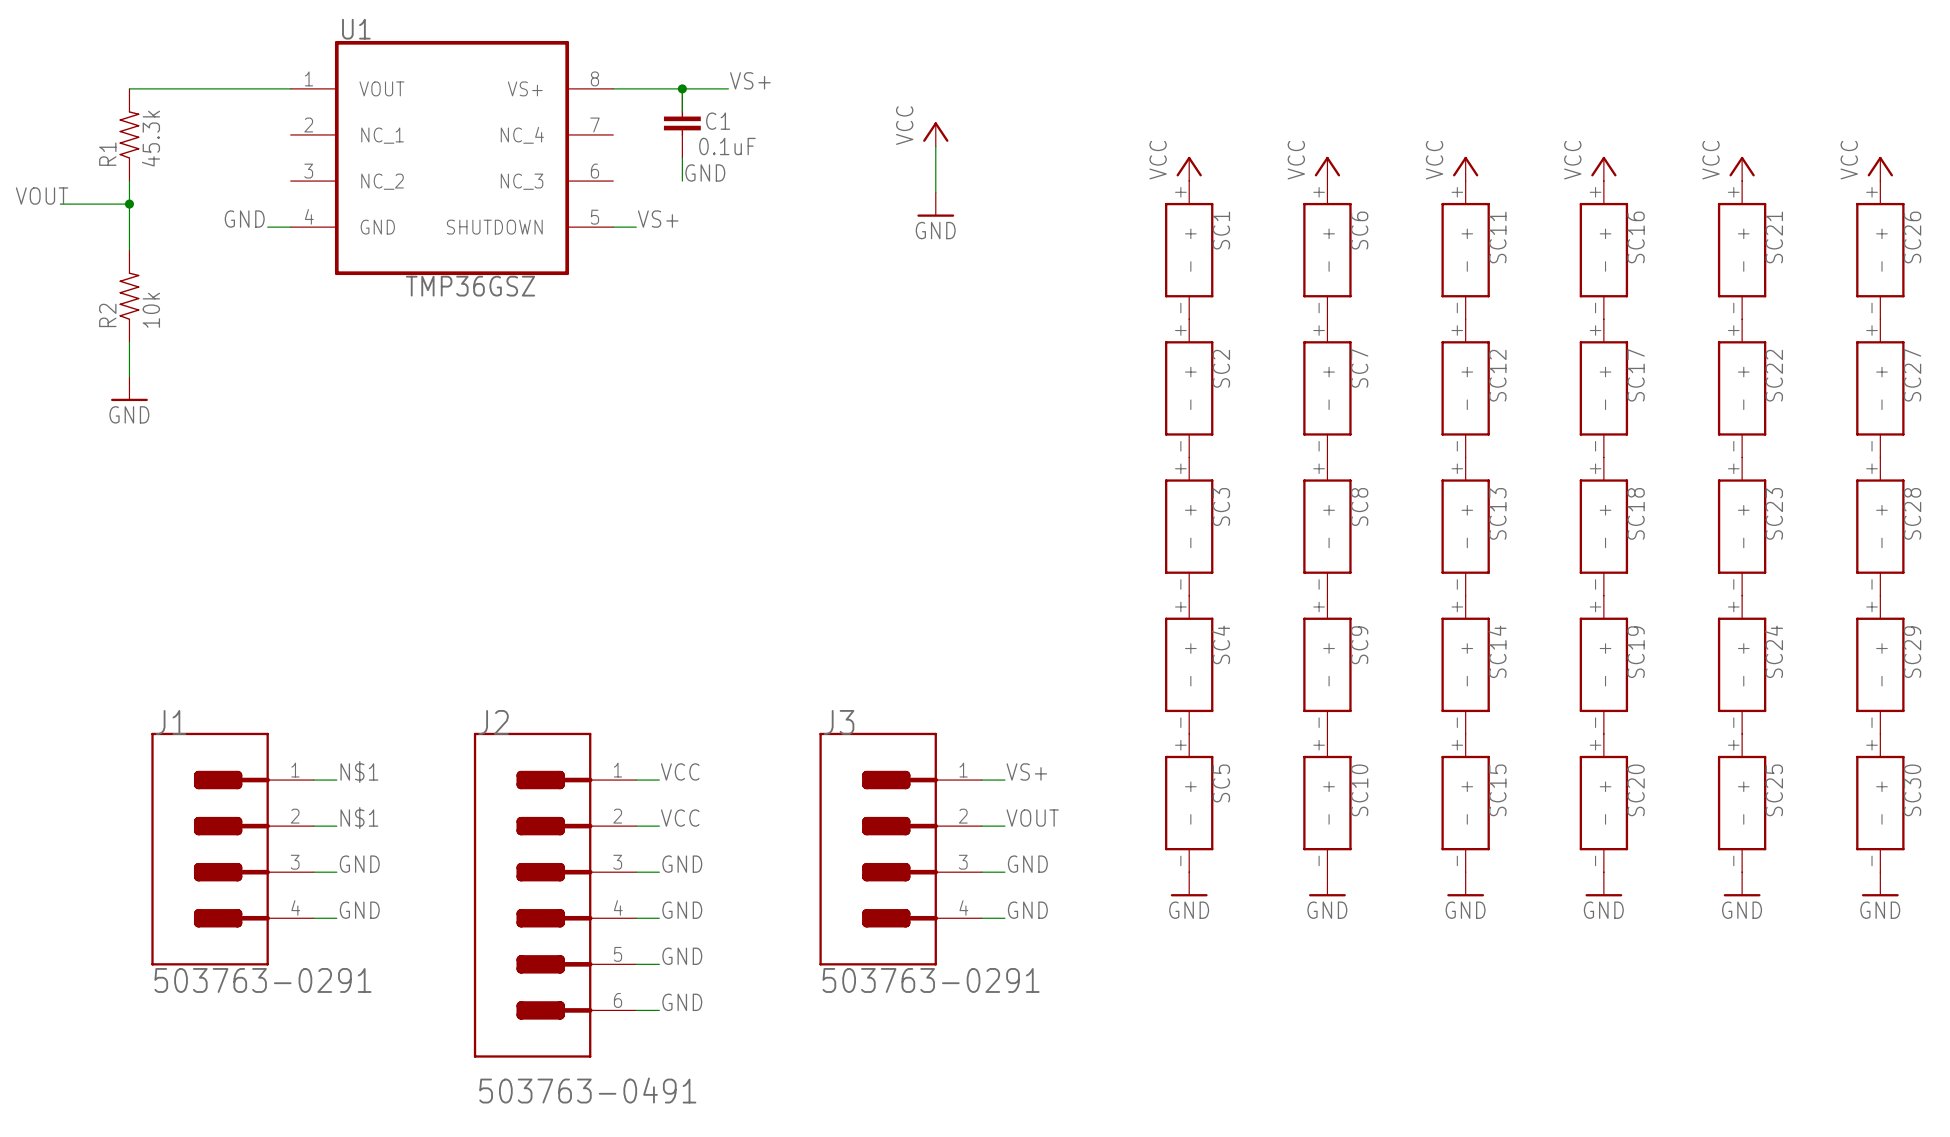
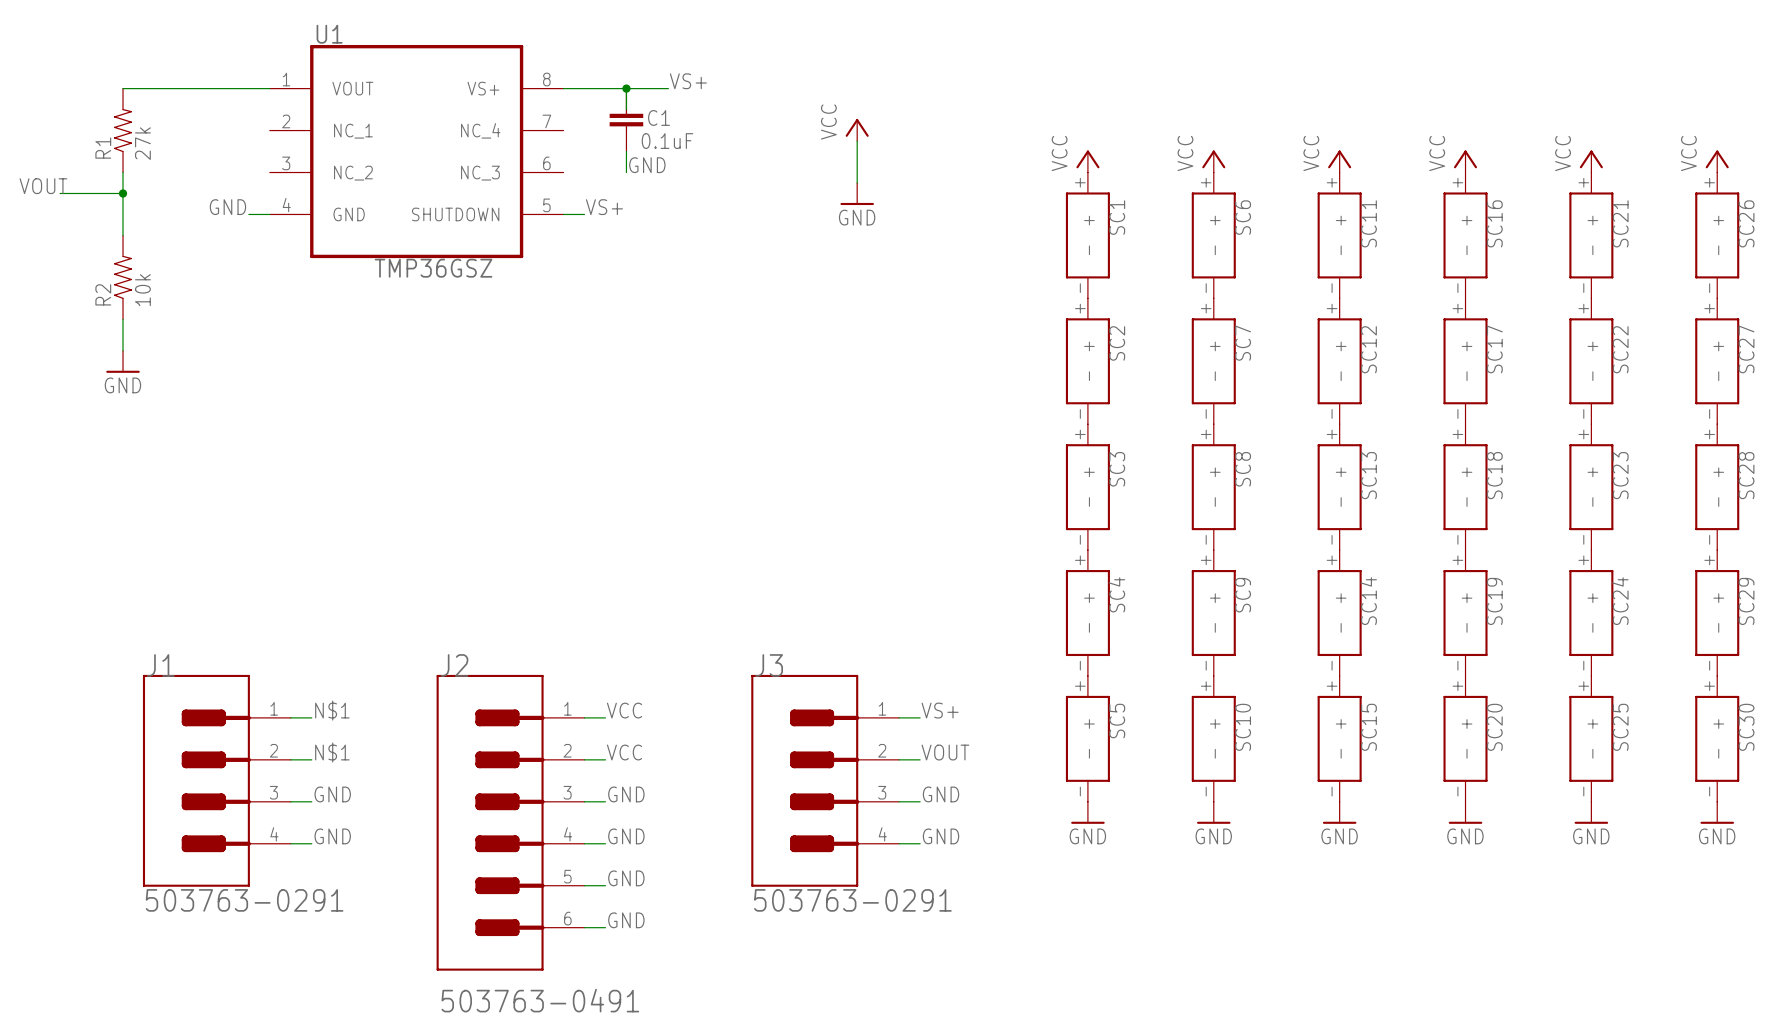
R1 value: 45.3k (150, 138) -> 27k (142, 143)

